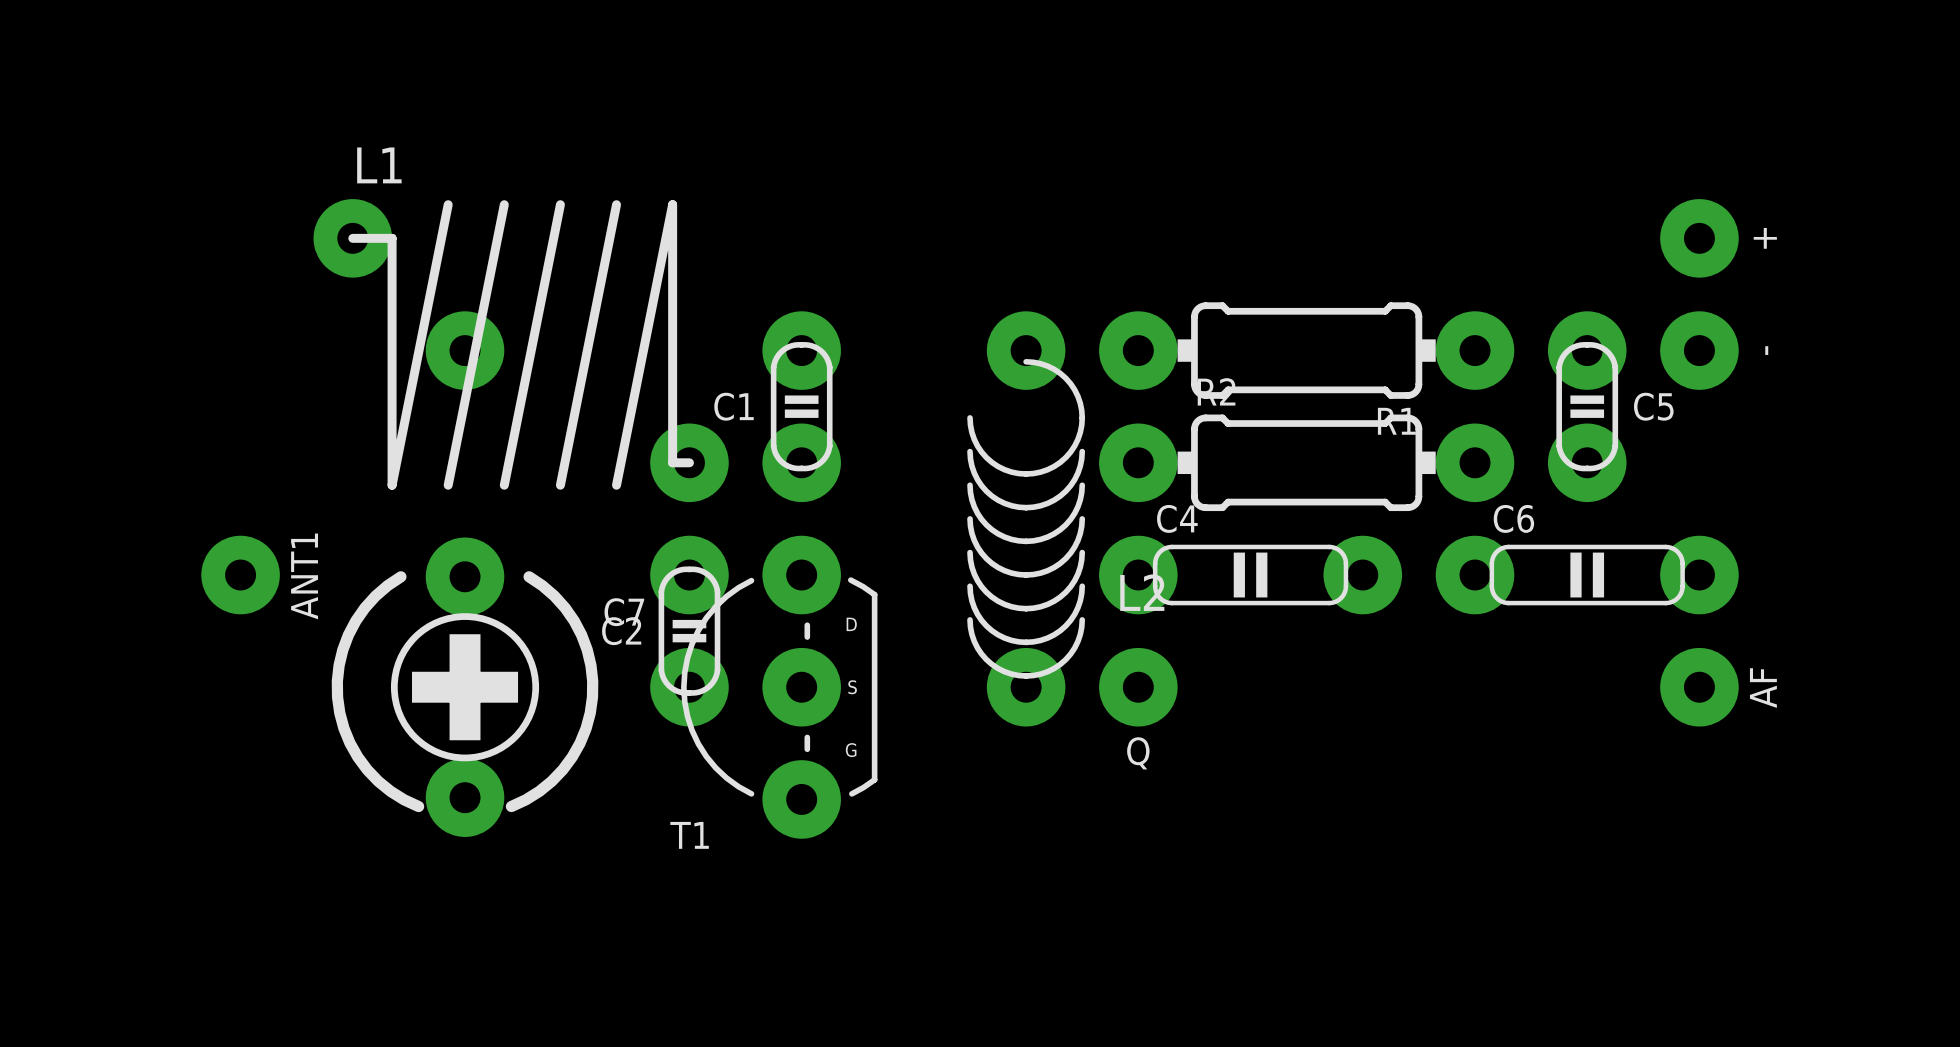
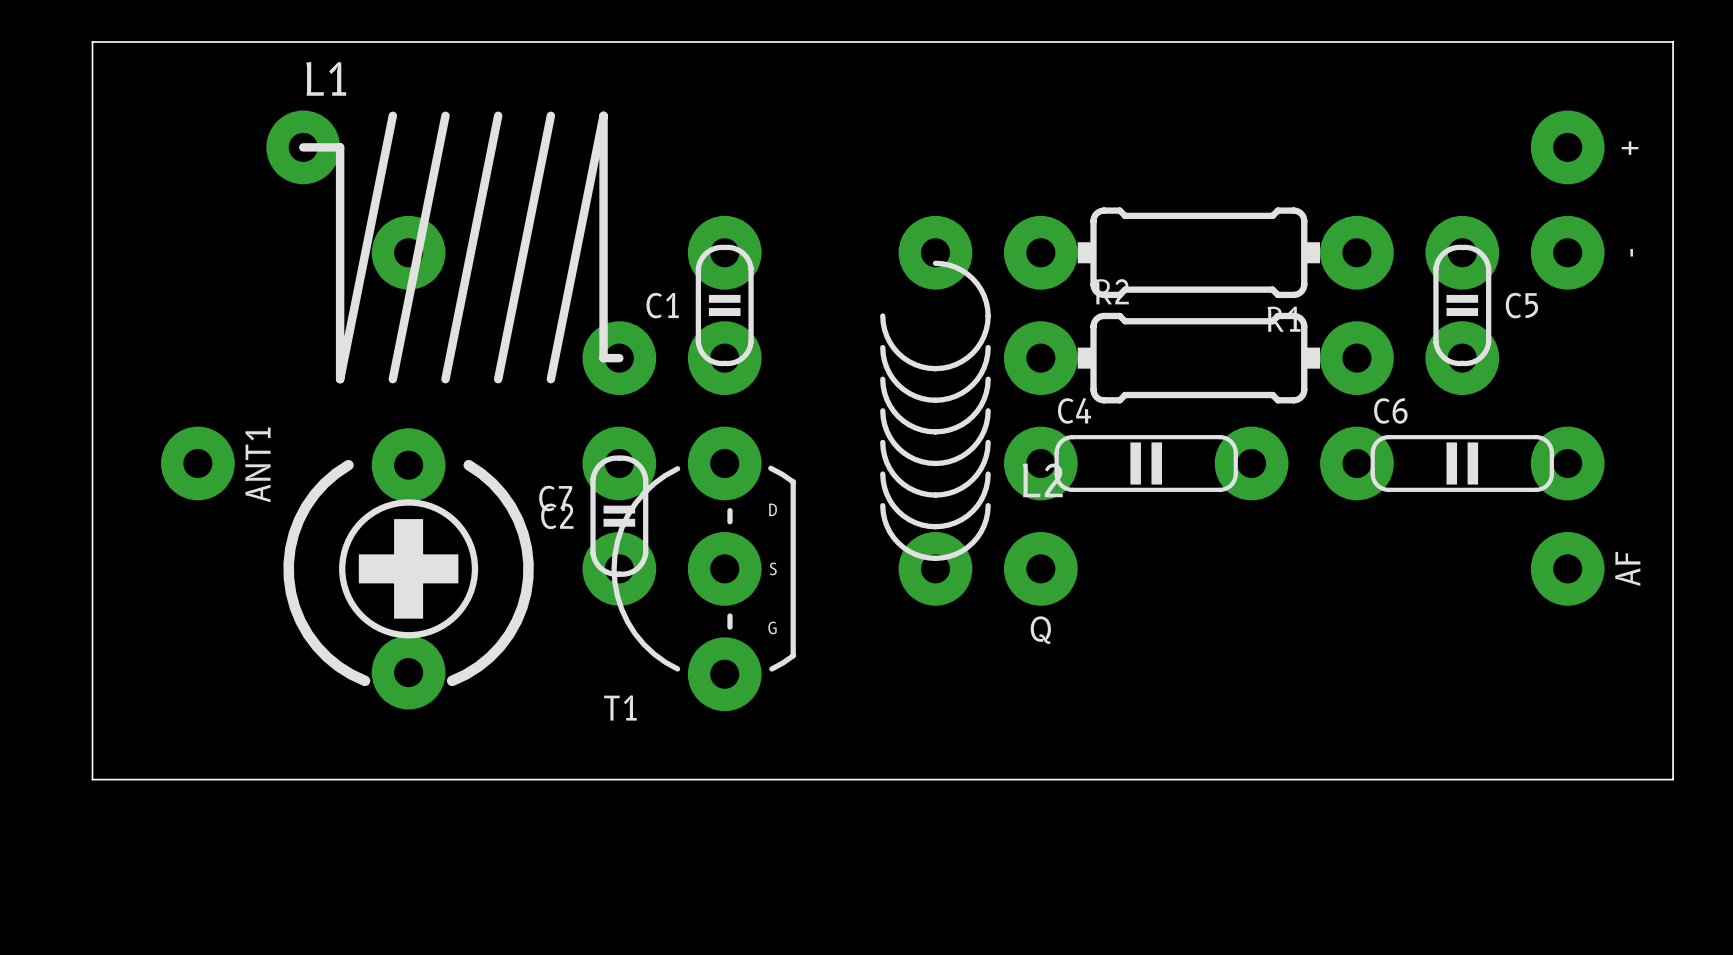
board edge: none -> (92, 42) (1673, 42) (1673, 779) (92, 779) (92, 42)

